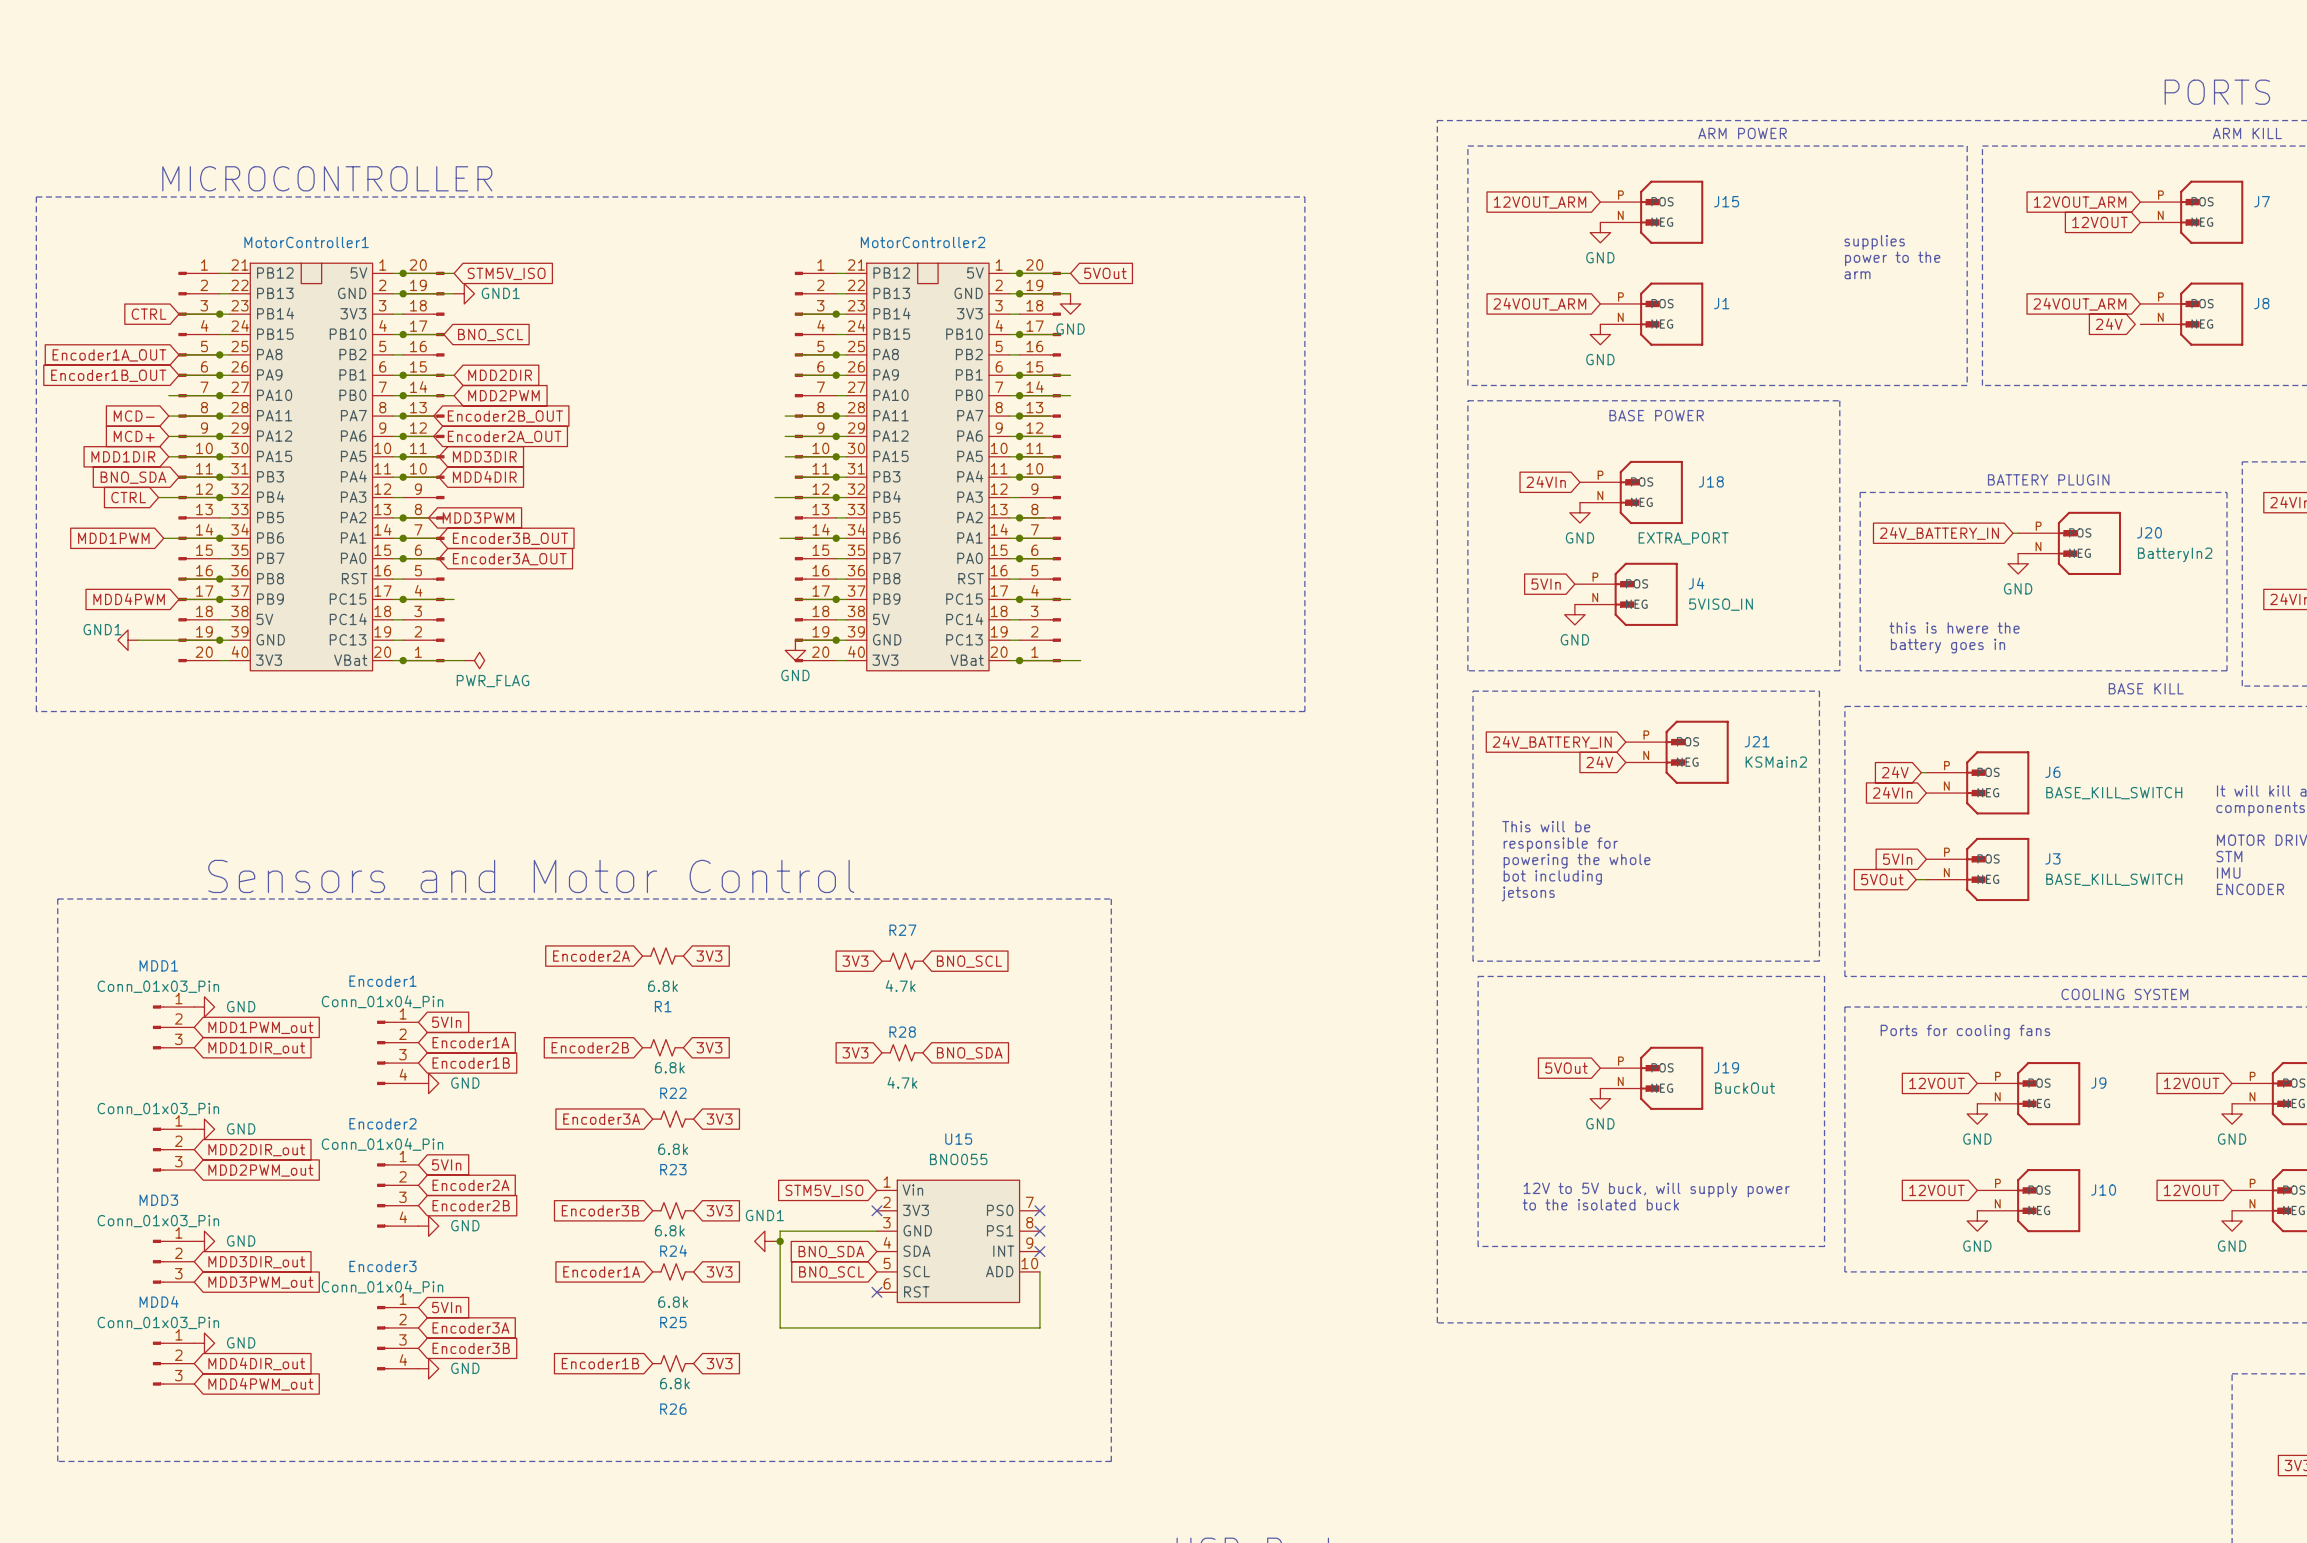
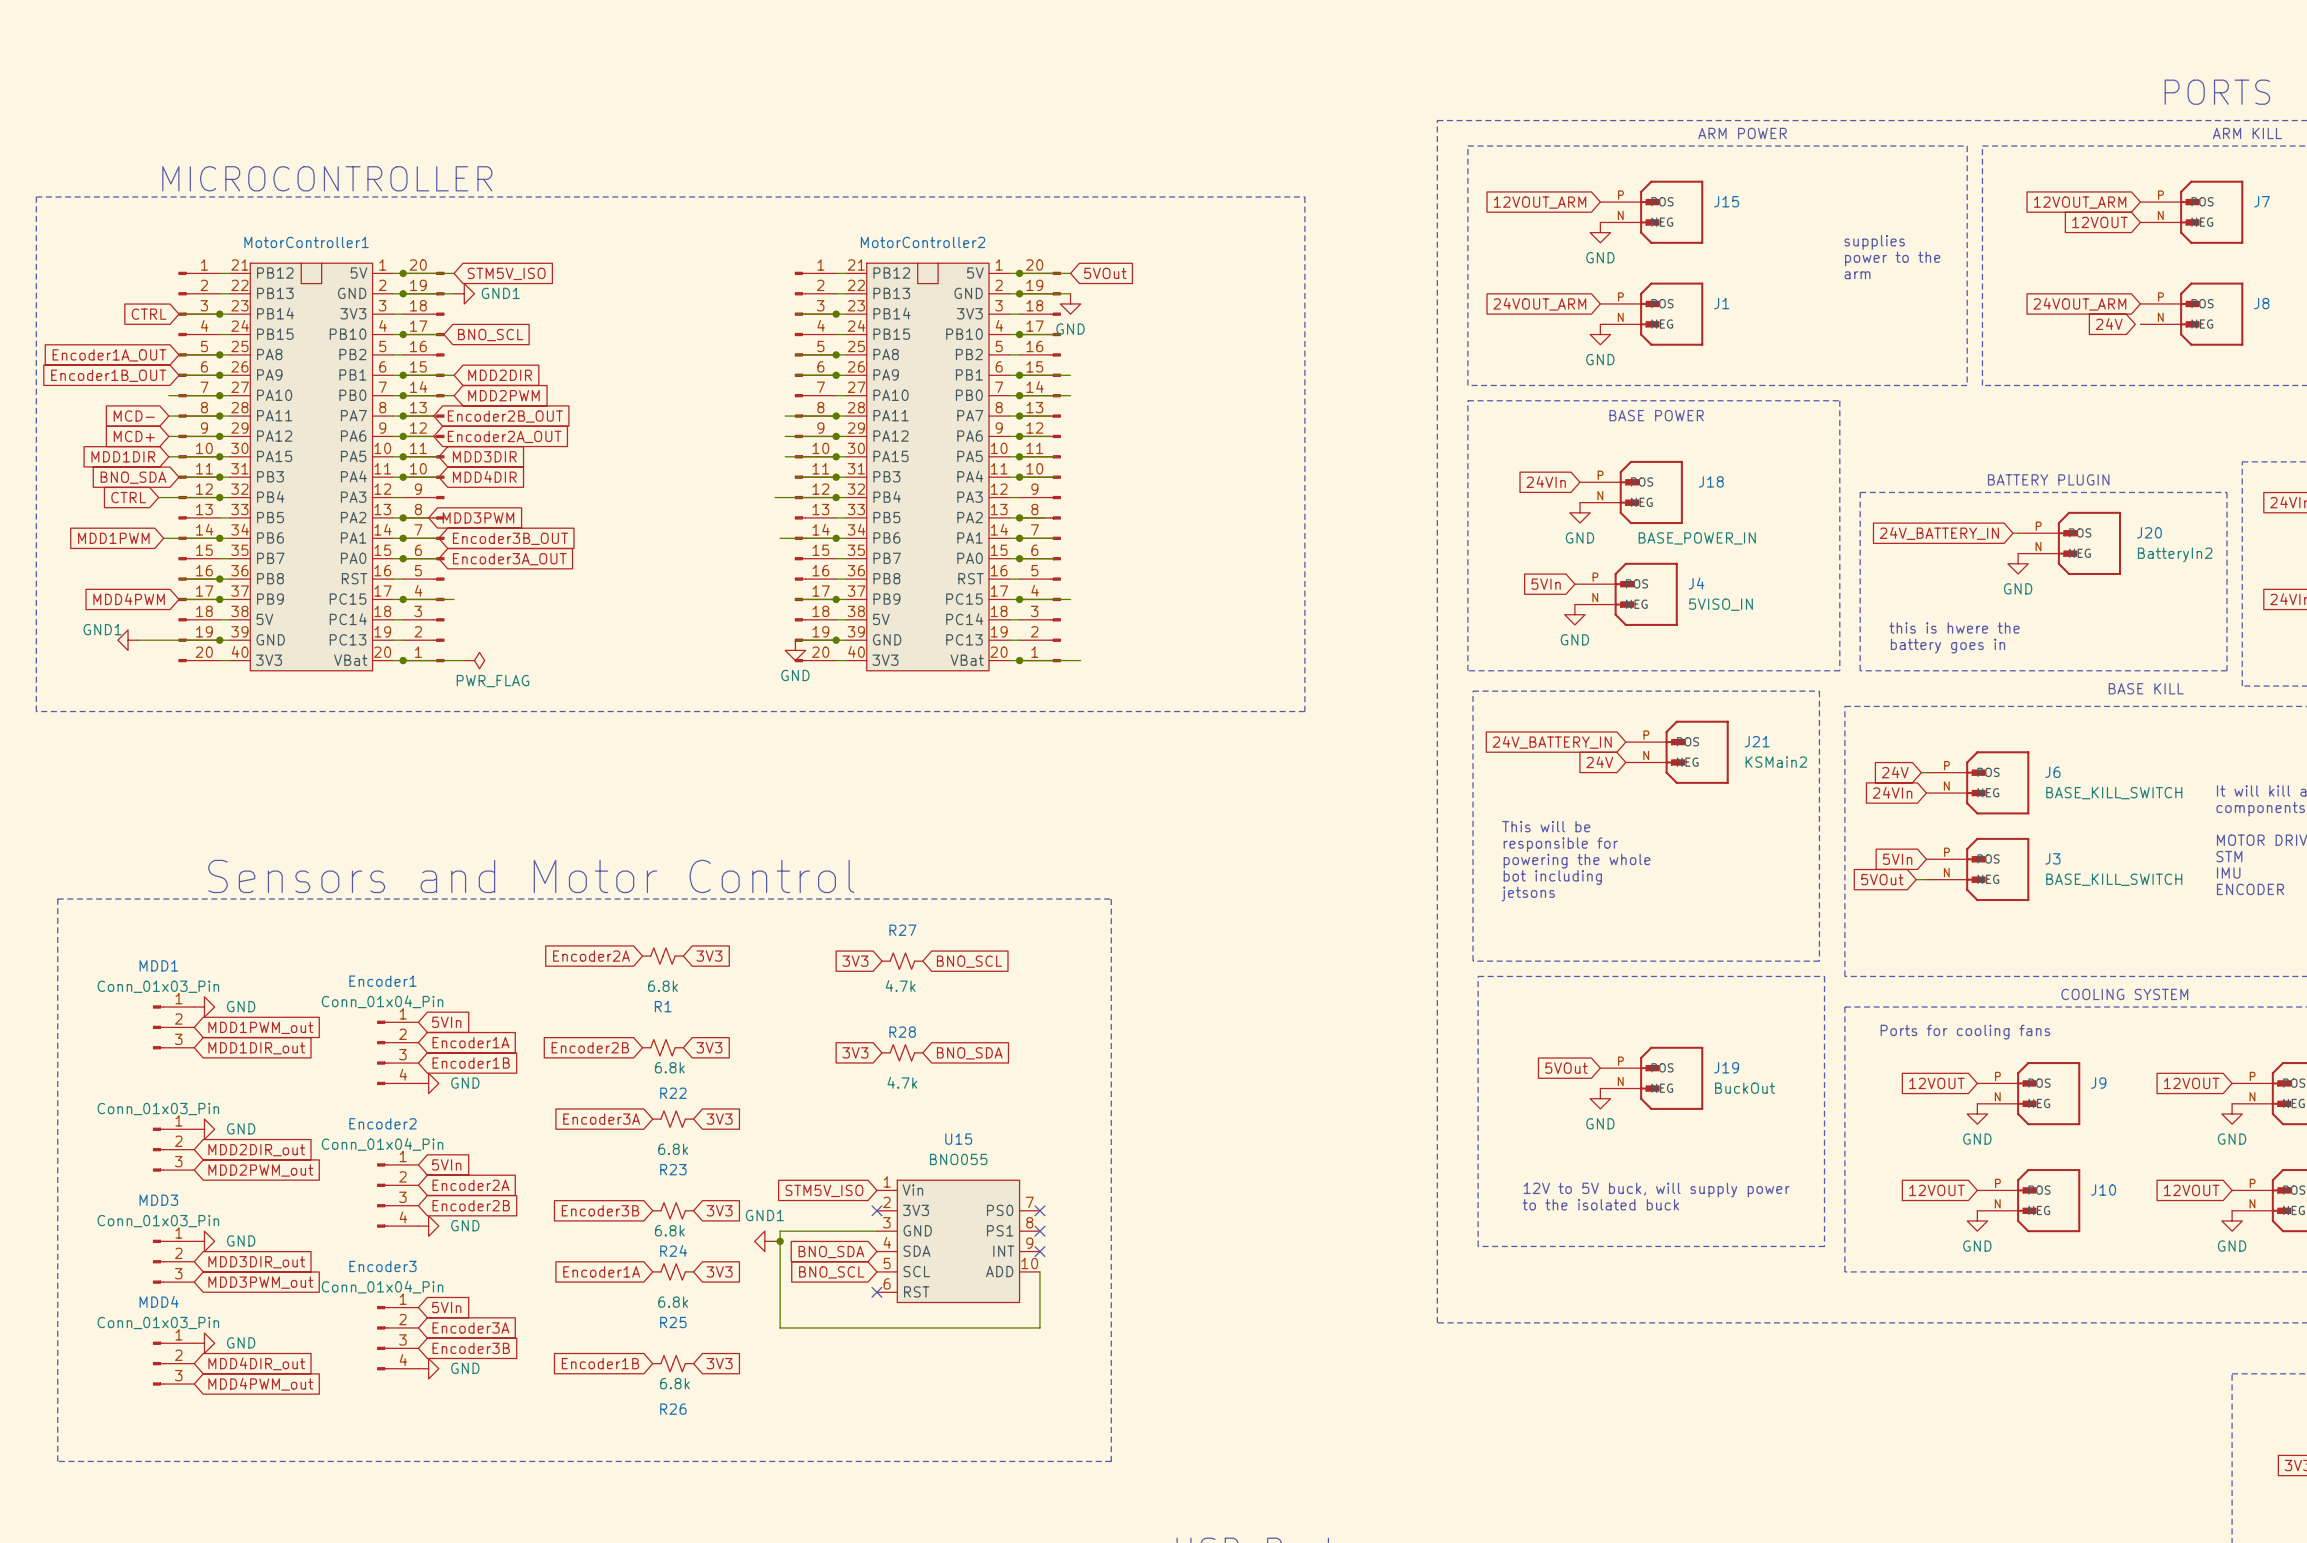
J18 value: EXTRA_PORT (1683, 538) -> BASE_POWER_IN (1697, 538)

